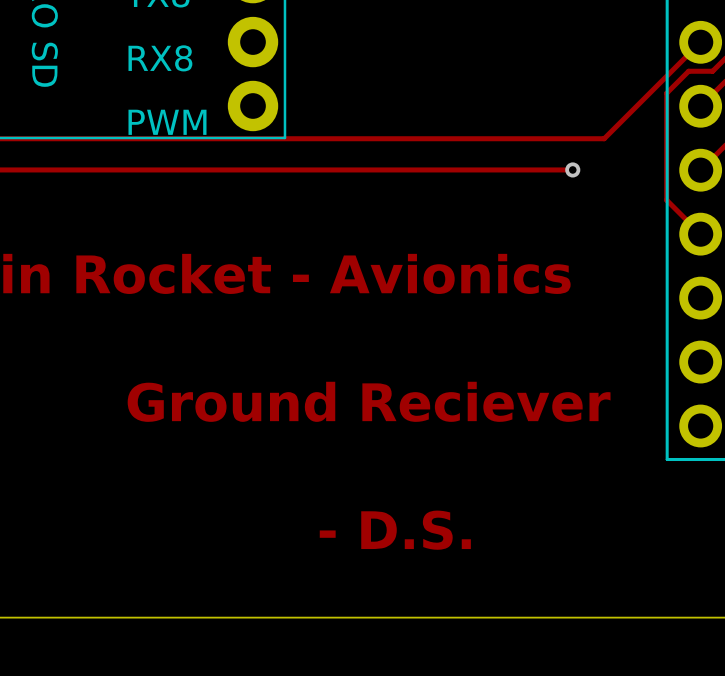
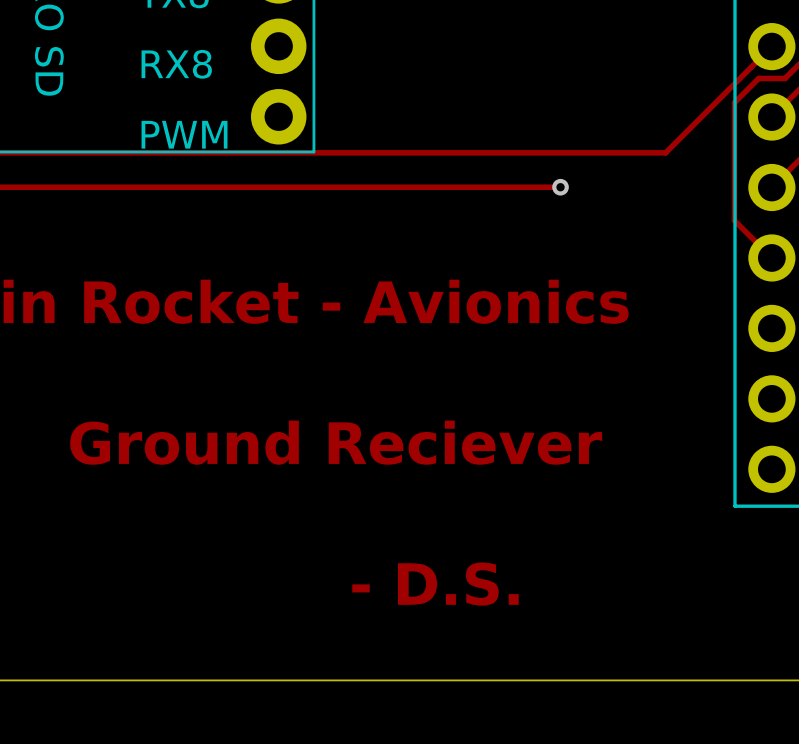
track: (508, 169) (572, 169) -> none
via position: (572, 169) -> (560, 187)
text position: Ground Reciever (369, 401) -> Ground Reciever (336, 442)

